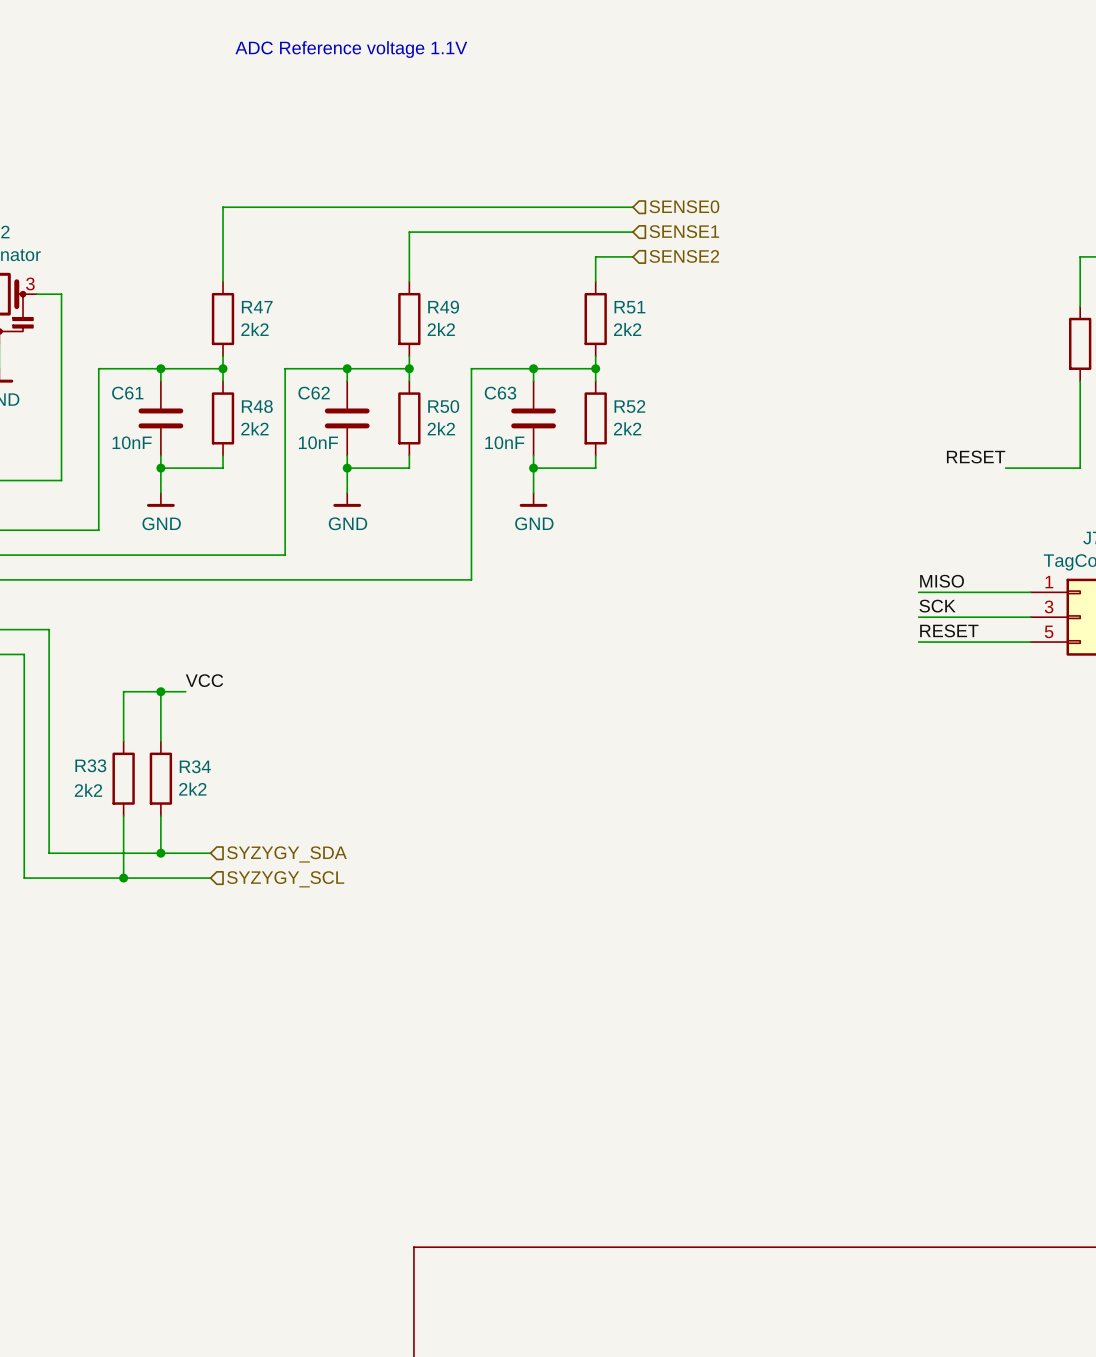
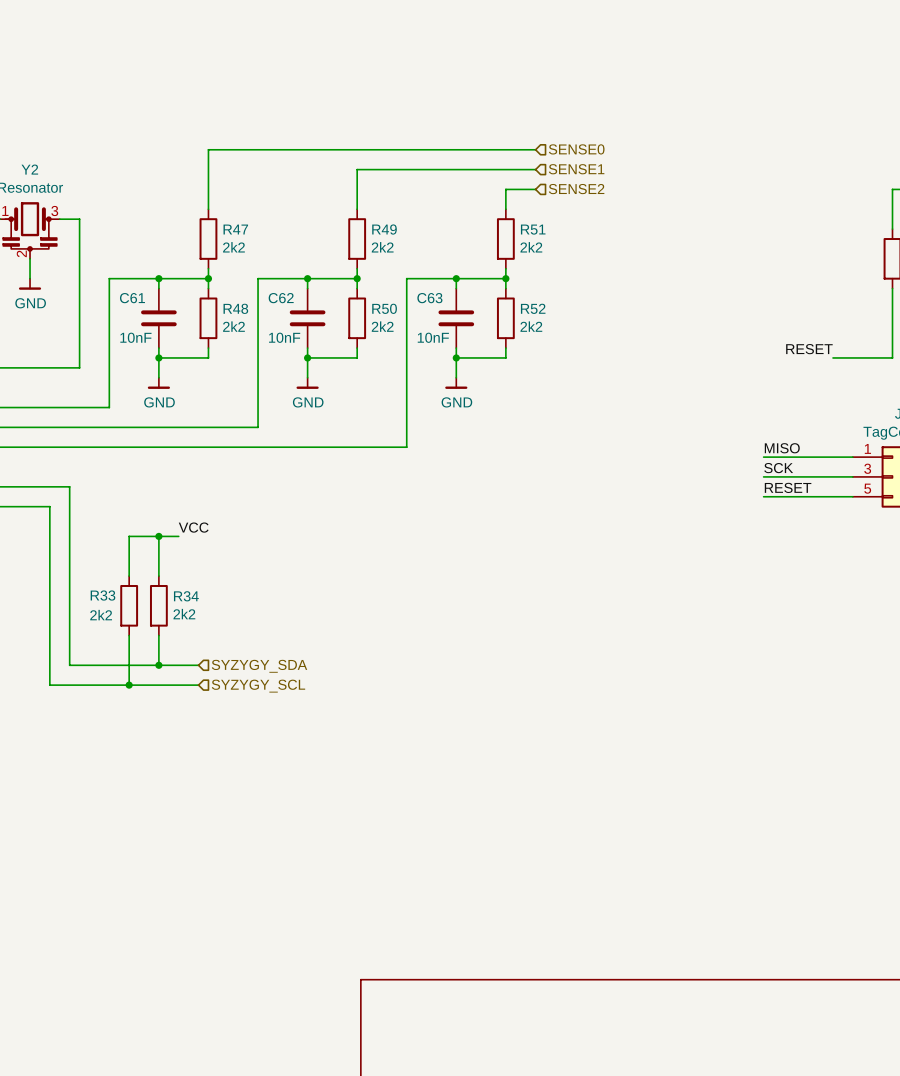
text: ADC Reference voltage 1.1V (351, 49) -> none

